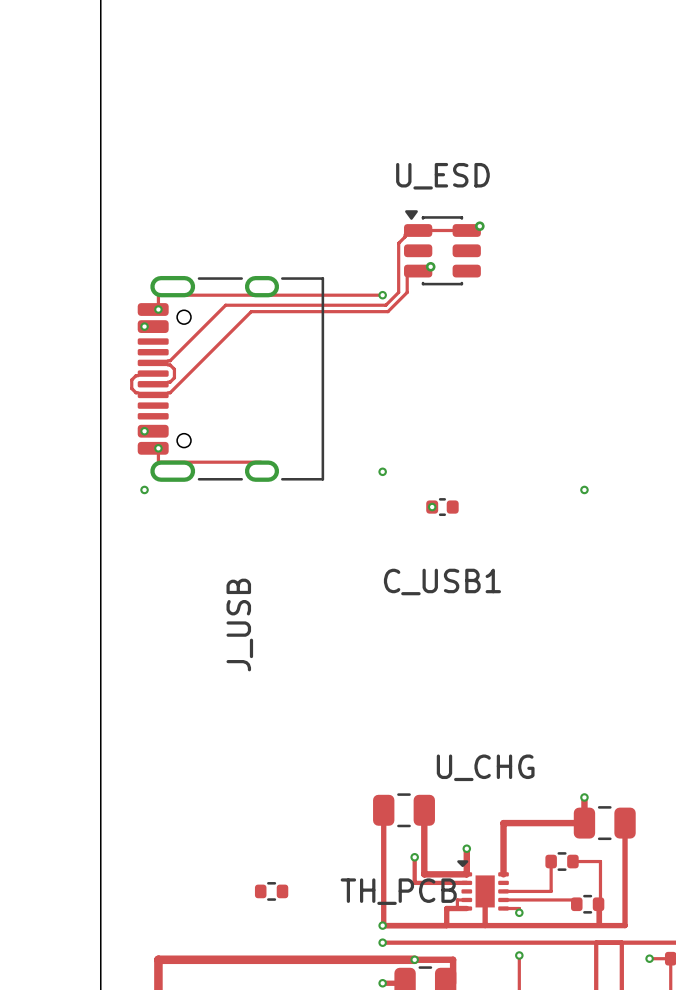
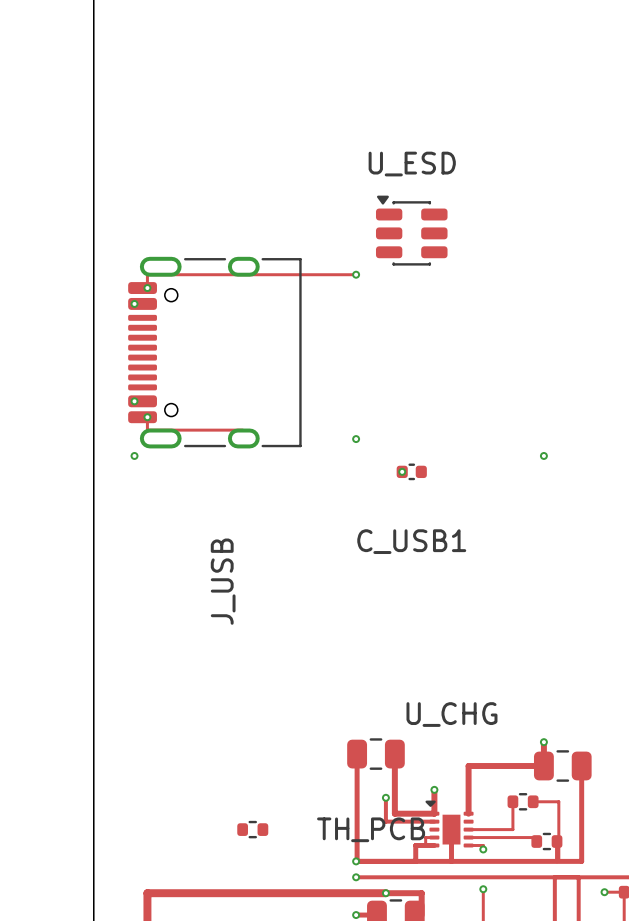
via: (479, 226) -> none
track: (430, 230) (454, 230) -> none
track: (405, 234) (398, 243) (398, 292) (385, 305) (225, 305) (168, 360) -> none
via: (430, 266) -> none
track: (407, 277) (407, 292) (387, 311) (251, 311) (168, 392) -> none
track: (168, 365) (174, 369) (174, 377) (168, 382) -> none
track: (138, 375) (131, 379) (131, 388) (138, 392) -> none

